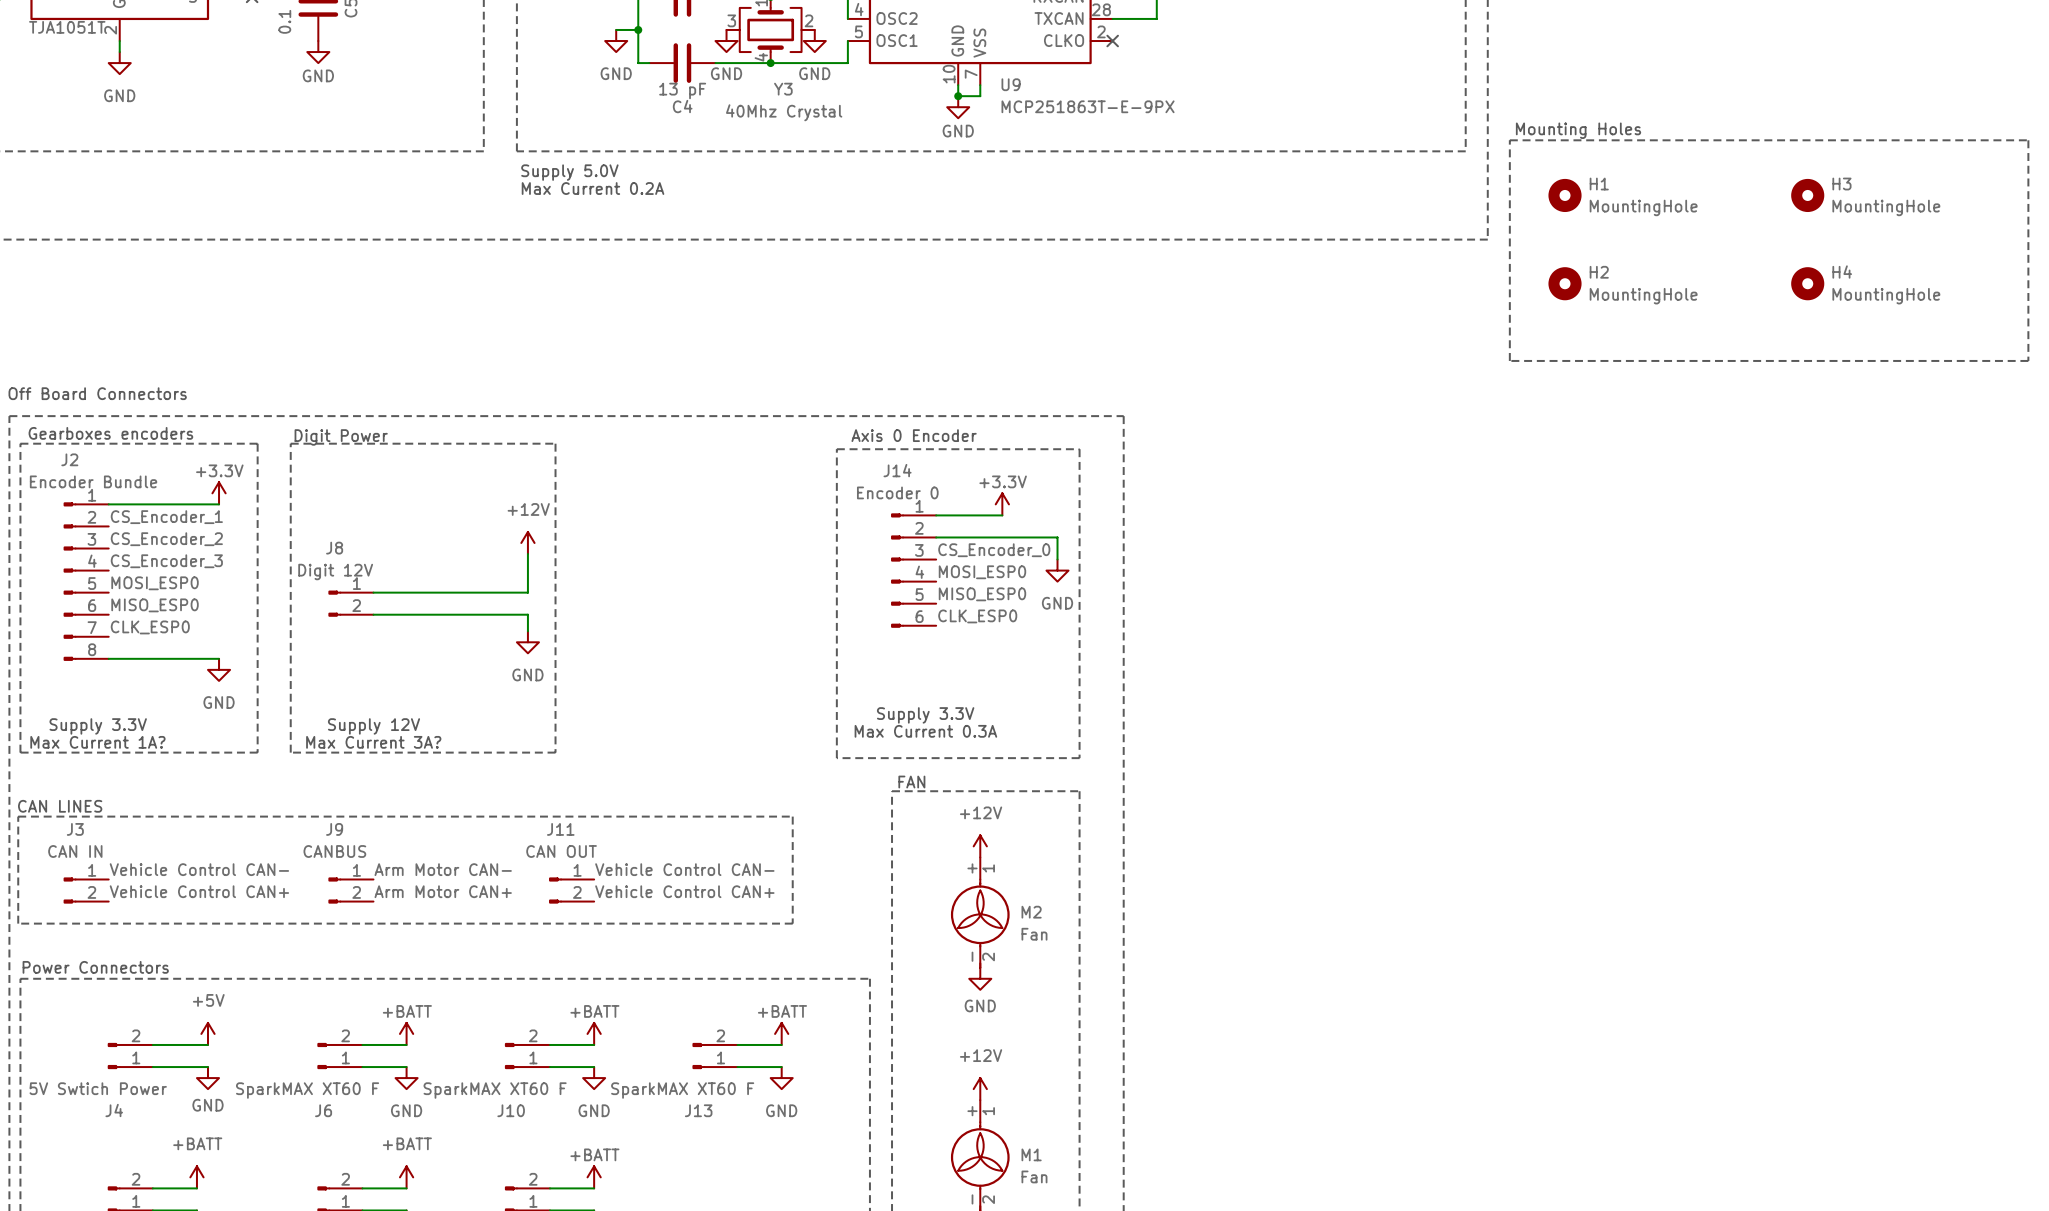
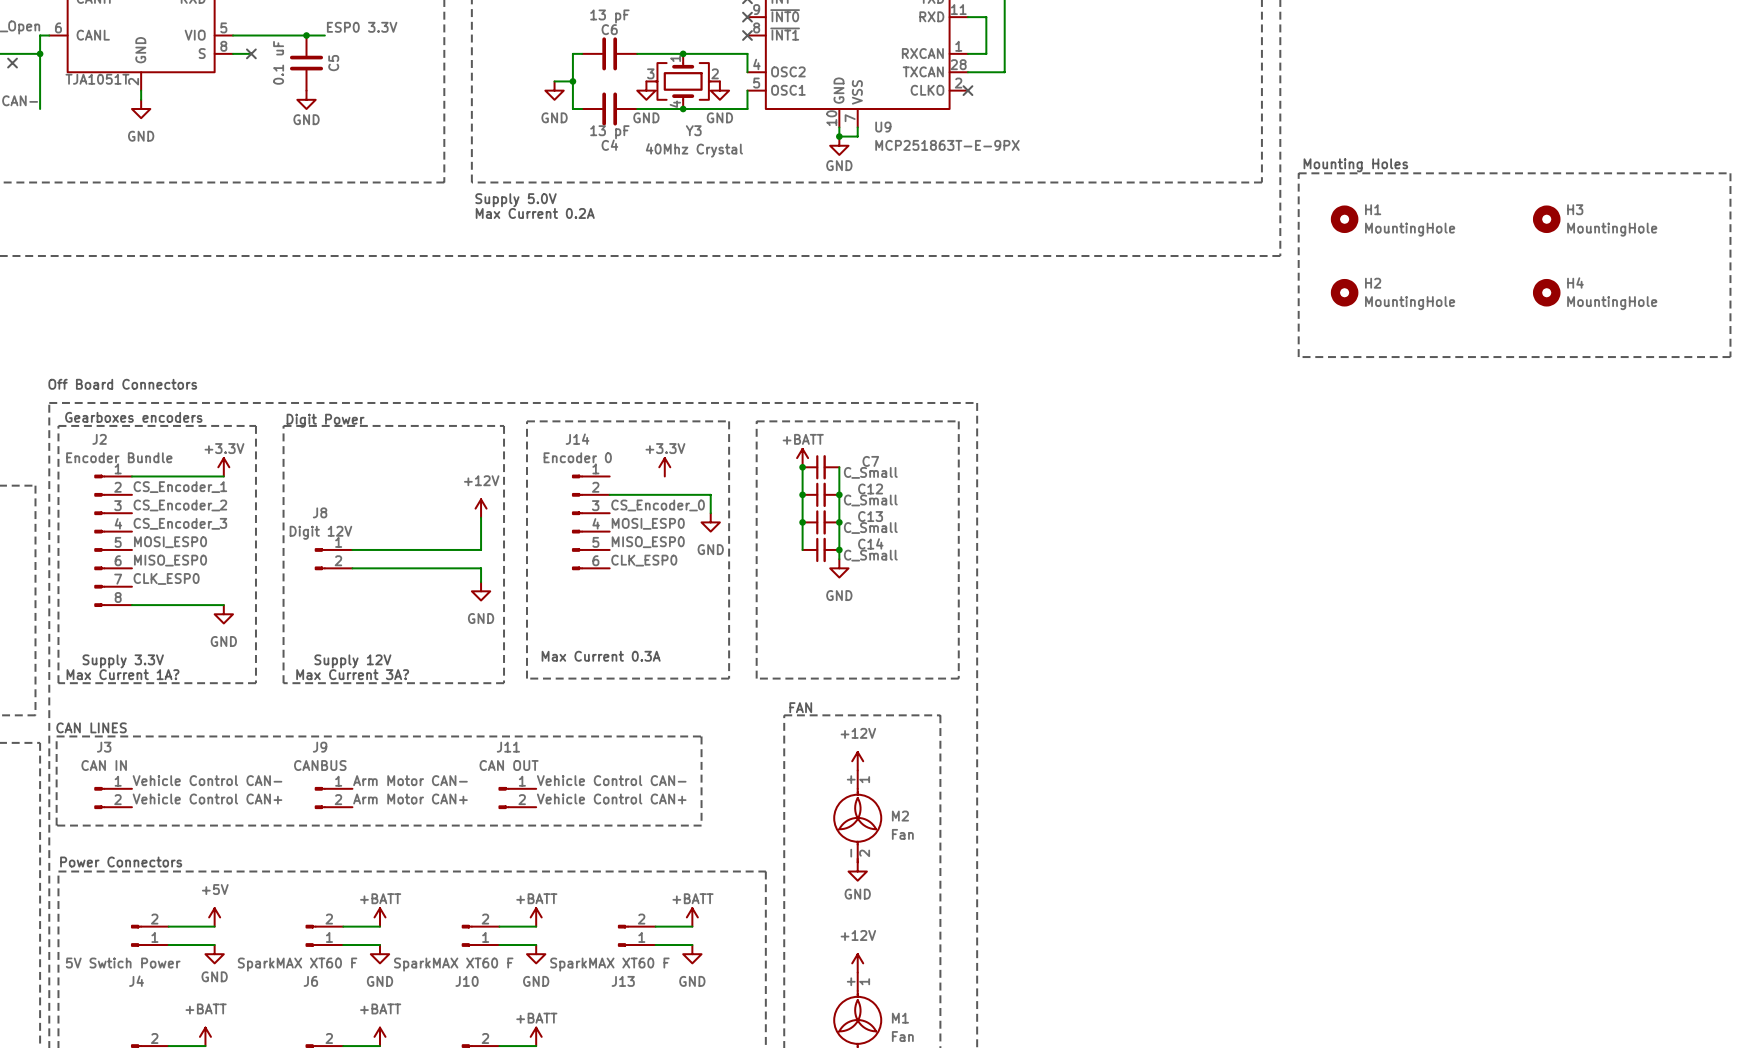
text: Axis 0 Encoder (914, 435) -> none
line: none -> (526, 421) (729, 421) (729, 678) (526, 678) (526, 421)
line: (836, 449) (1079, 449) (1079, 758) (836, 758) (836, 449) -> (756, 421) (958, 421) (958, 678) (756, 678) (756, 421)
power symbol: none -> +BATT (802, 458)
power symbol: none -> +3.3V (664, 467)
wire: none -> (802, 467) (802, 549)
junction: none -> (802, 467)
C7: none -> C_Small (820, 467)
wire: none -> (839, 467) (839, 559)
power symbol: +3.3V (1002, 504) -> none
wire: (936, 515) (1002, 515) -> none
wire: none -> (609, 494) (710, 494) (710, 513)
junction: none -> (802, 494)
C12: none -> C_Small (820, 494)
junction: none -> (839, 494)
wire: (936, 537) (1057, 537) (1057, 559) -> none
label: none -> CS_Encoder_0 (658, 505)
label: CS_Encoder_0 (994, 550) -> none
power symbol: none -> GND (710, 522)
junction: none -> (802, 522)
C13: none -> C_Small (820, 522)
junction: none -> (839, 522)
label: none -> MOSI_ESP0 (648, 523)
J14 position: (913, 570) -> (591, 522)
power symbol position: GND (1057, 570) -> GND (839, 568)
label: MOSI_ESP0 (982, 572) -> none
label: none -> MISO_ESP0 (648, 542)
C14: none -> C_Small (820, 549)
junction: none -> (839, 549)
label: MISO_ESP0 (982, 594) -> none
label: none -> CLK_ESP0 (644, 560)
label: CLK_ESP0 (977, 616) -> none
text: Supply 3.3V (925, 715) -> none
text: none -> Max Current 0.3A (601, 656)
text: Max Current 0.3A (925, 731) -> none

